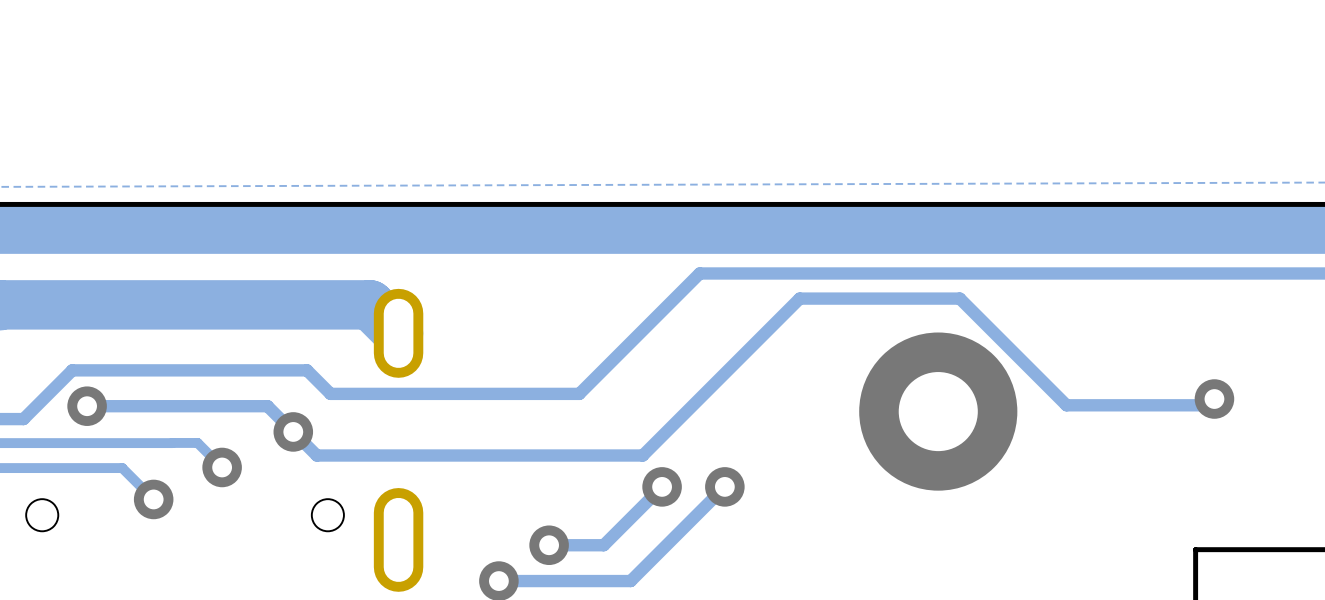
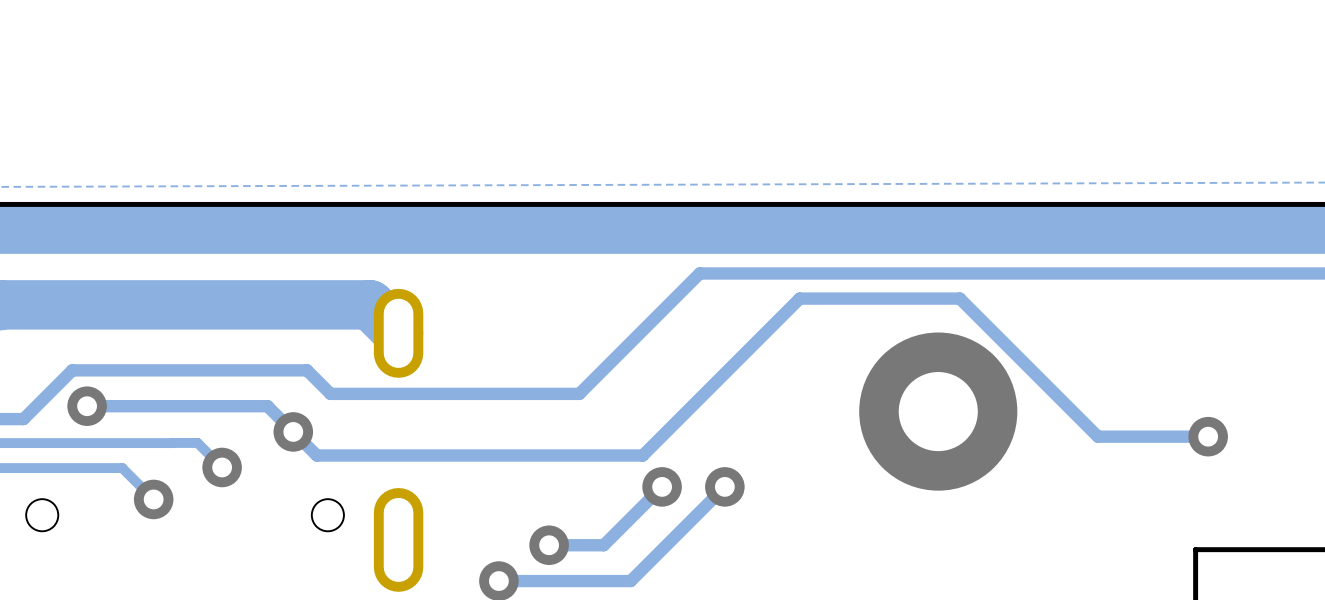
track: (1214, 399) (1208, 405) (1066, 405) -> (1208, 436) (1097, 436) (1066, 405)
via position: (1214, 399) -> (1208, 436)

